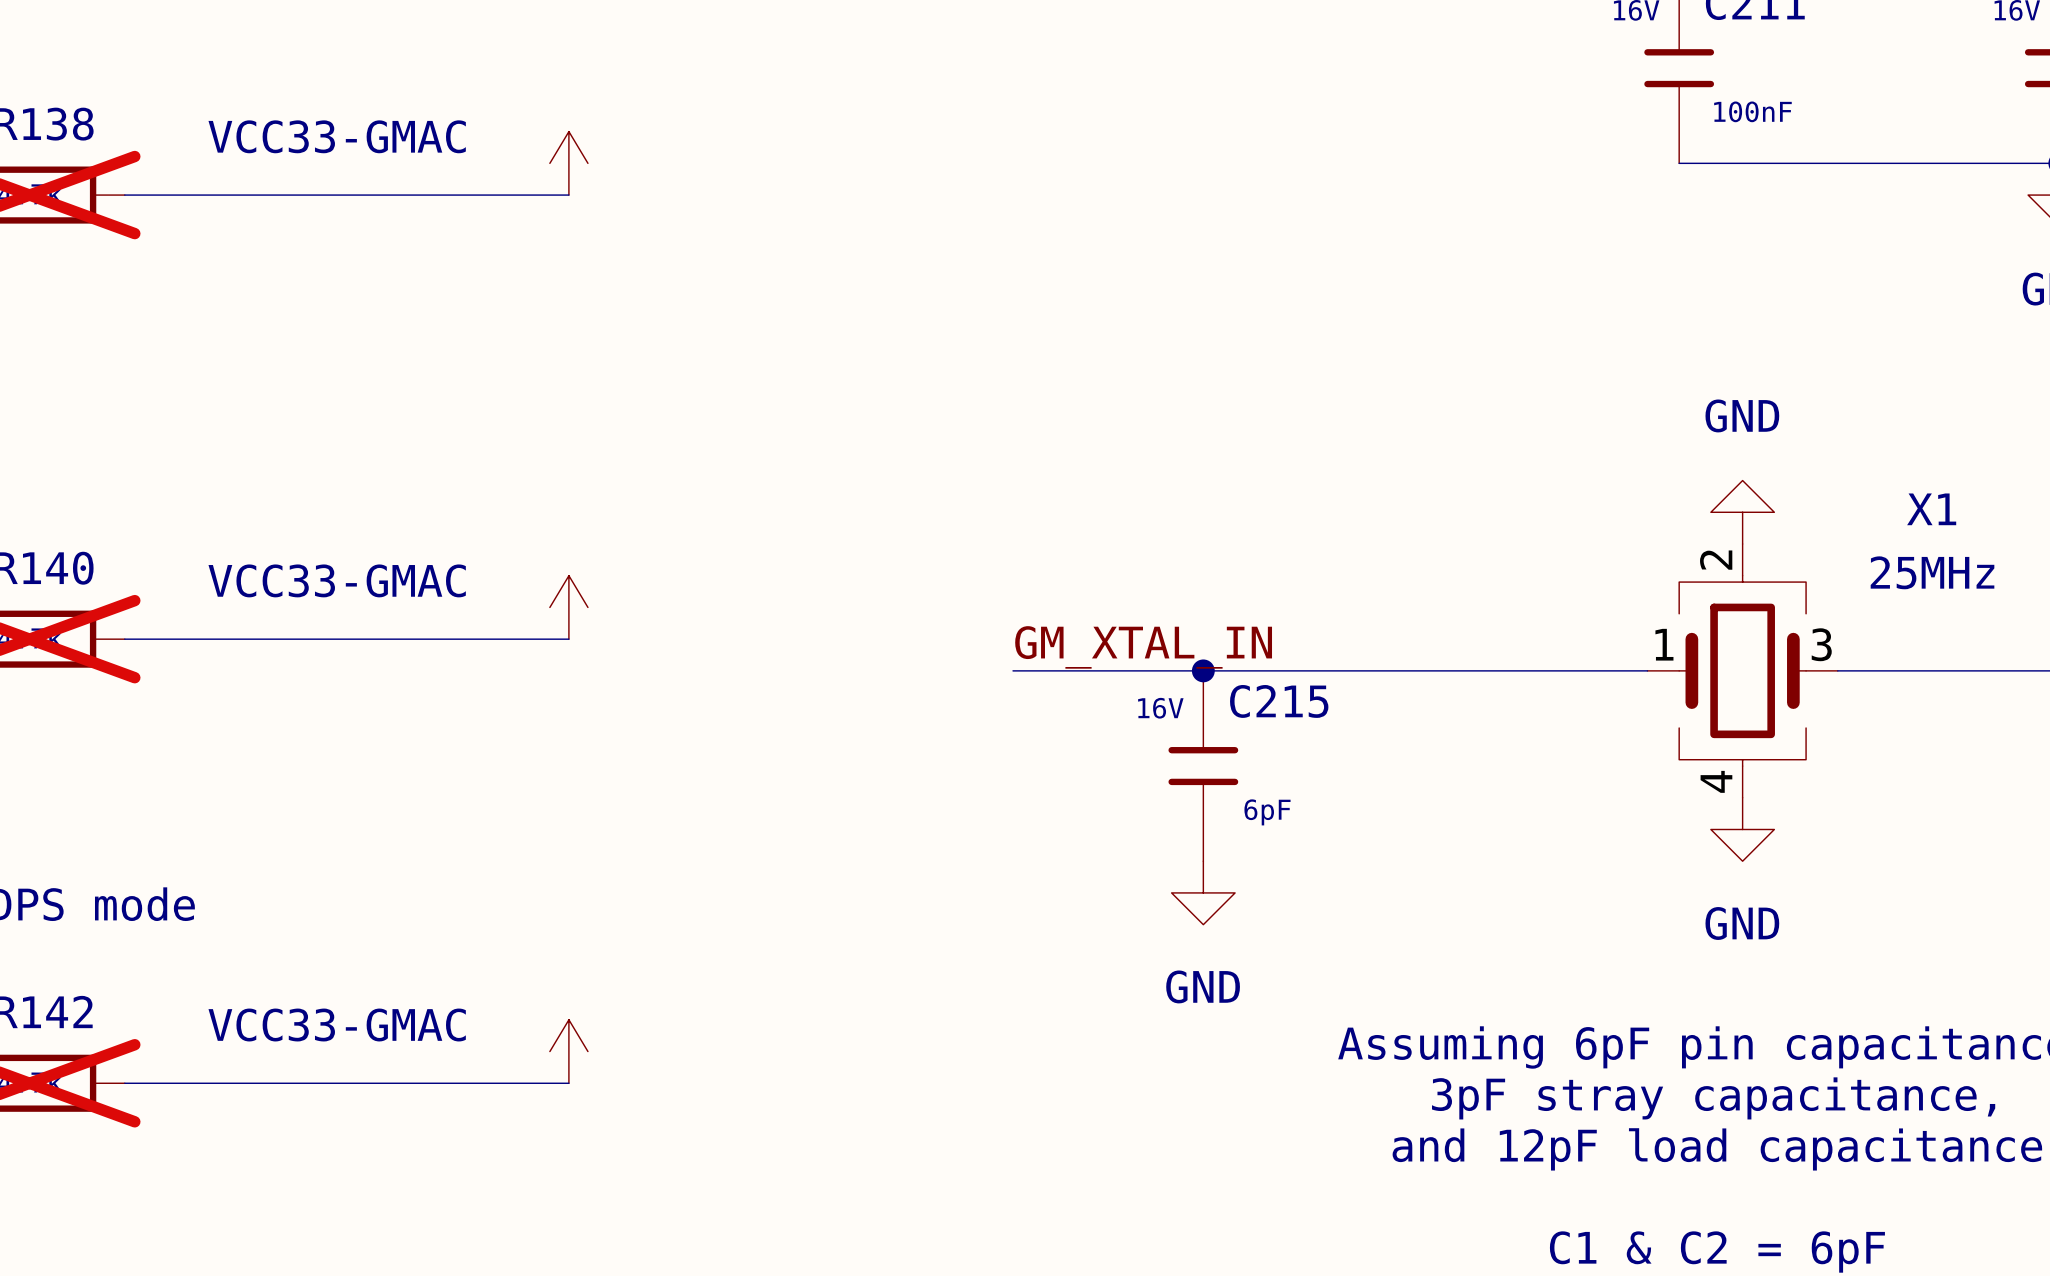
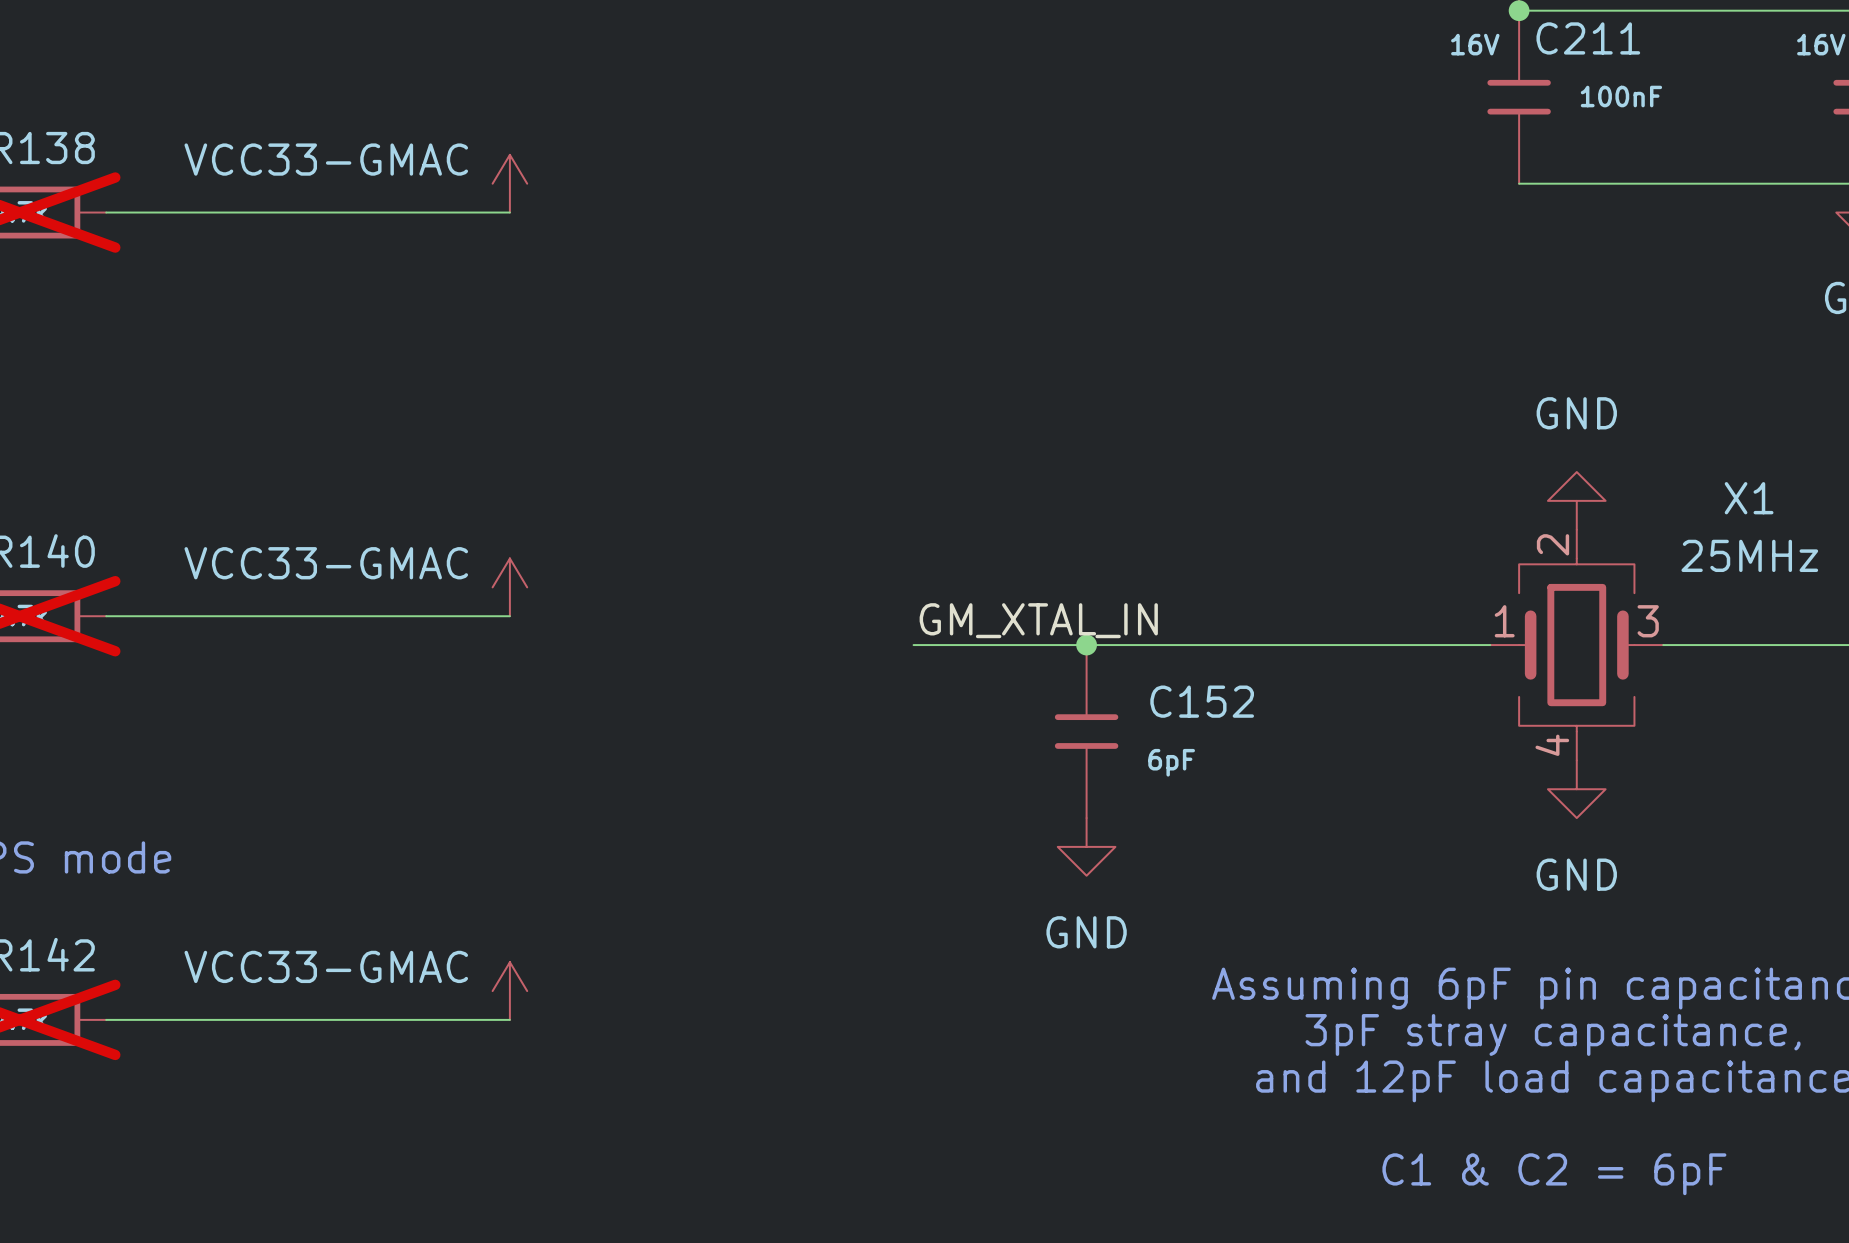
C211 value position: 100nF (1752, 111) -> 100nF (1621, 96)
C215 name: C215 (1279, 701) -> C152 (1202, 701)
C215 text: 16V (1160, 708) -> none
C215 value position: 6pF (1267, 812) -> 6pF (1171, 762)

